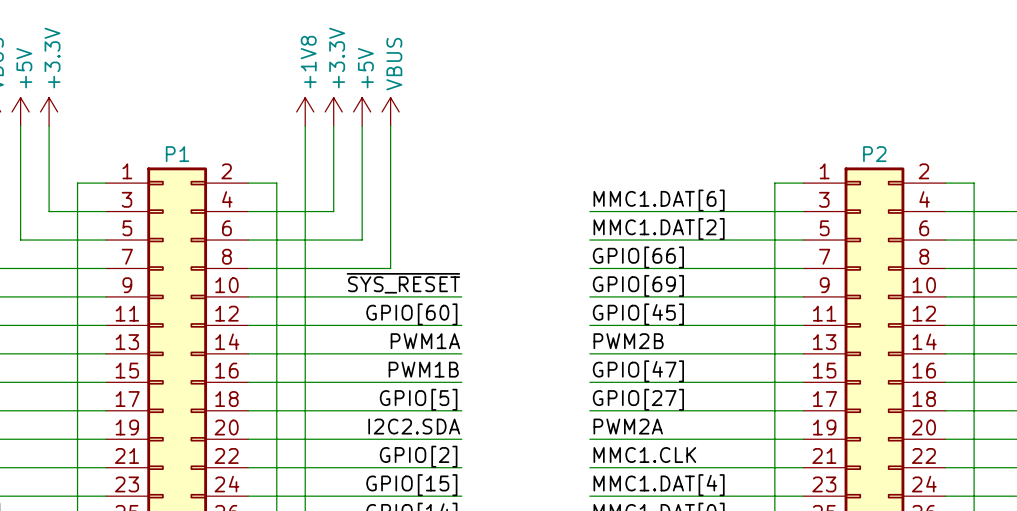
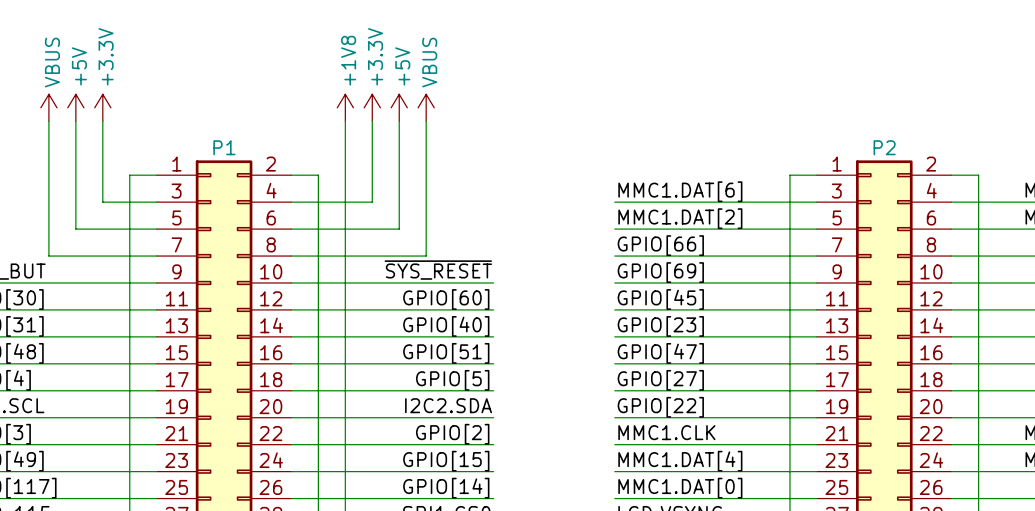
label: PWM1A (425, 341) -> GPIO[40] (446, 326)
label: PWM2B (628, 341) -> GPIO[23] (660, 326)
label: PWM1B (423, 369) -> GPIO[51] (446, 353)
label: PWM2A (628, 426) -> GPIO[22] (660, 407)

